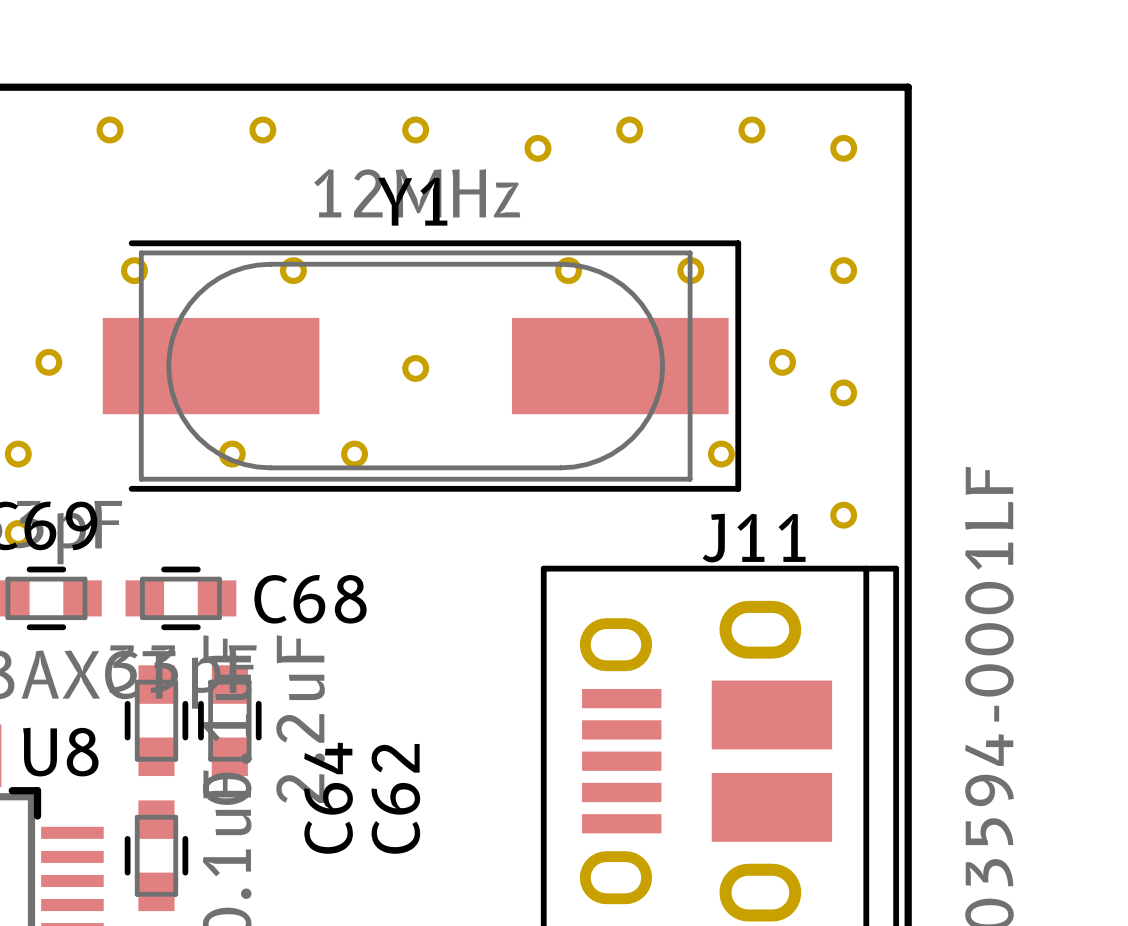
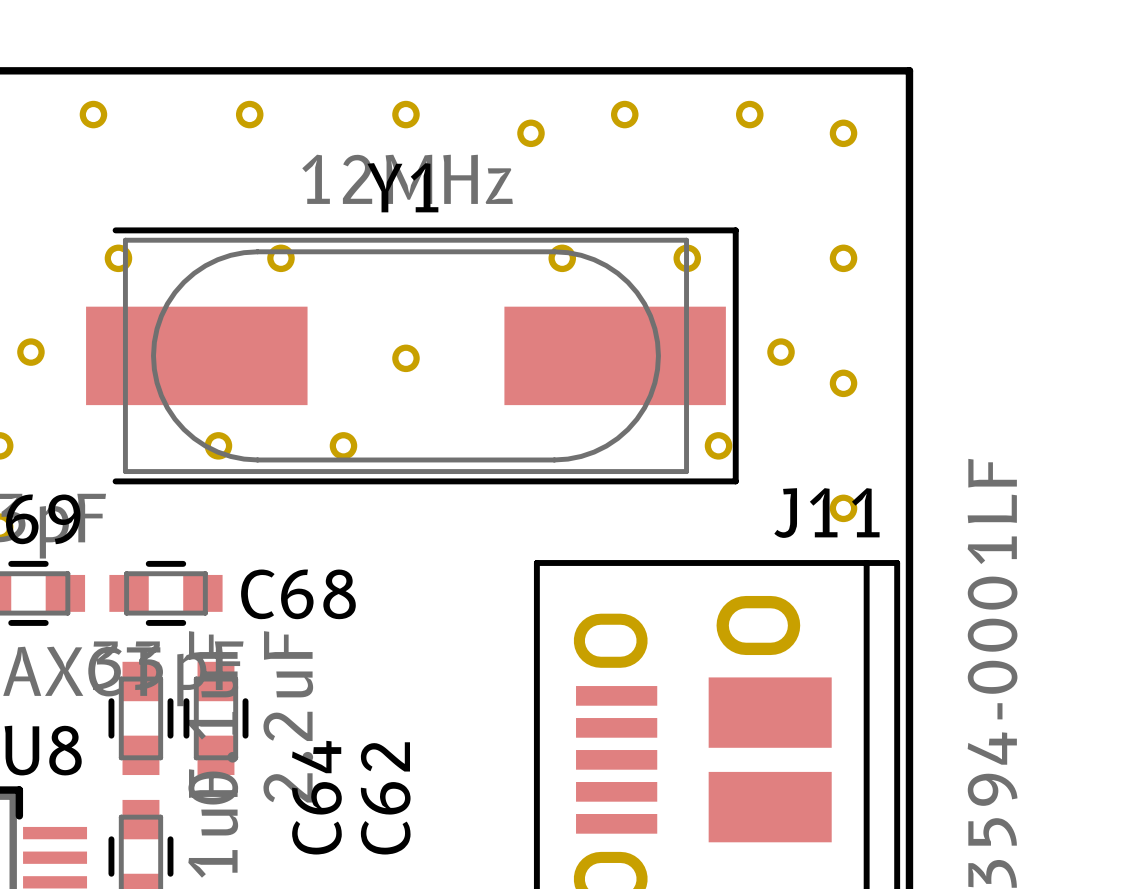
J11 name position: J11 (754, 538) -> J11 (826, 513)

